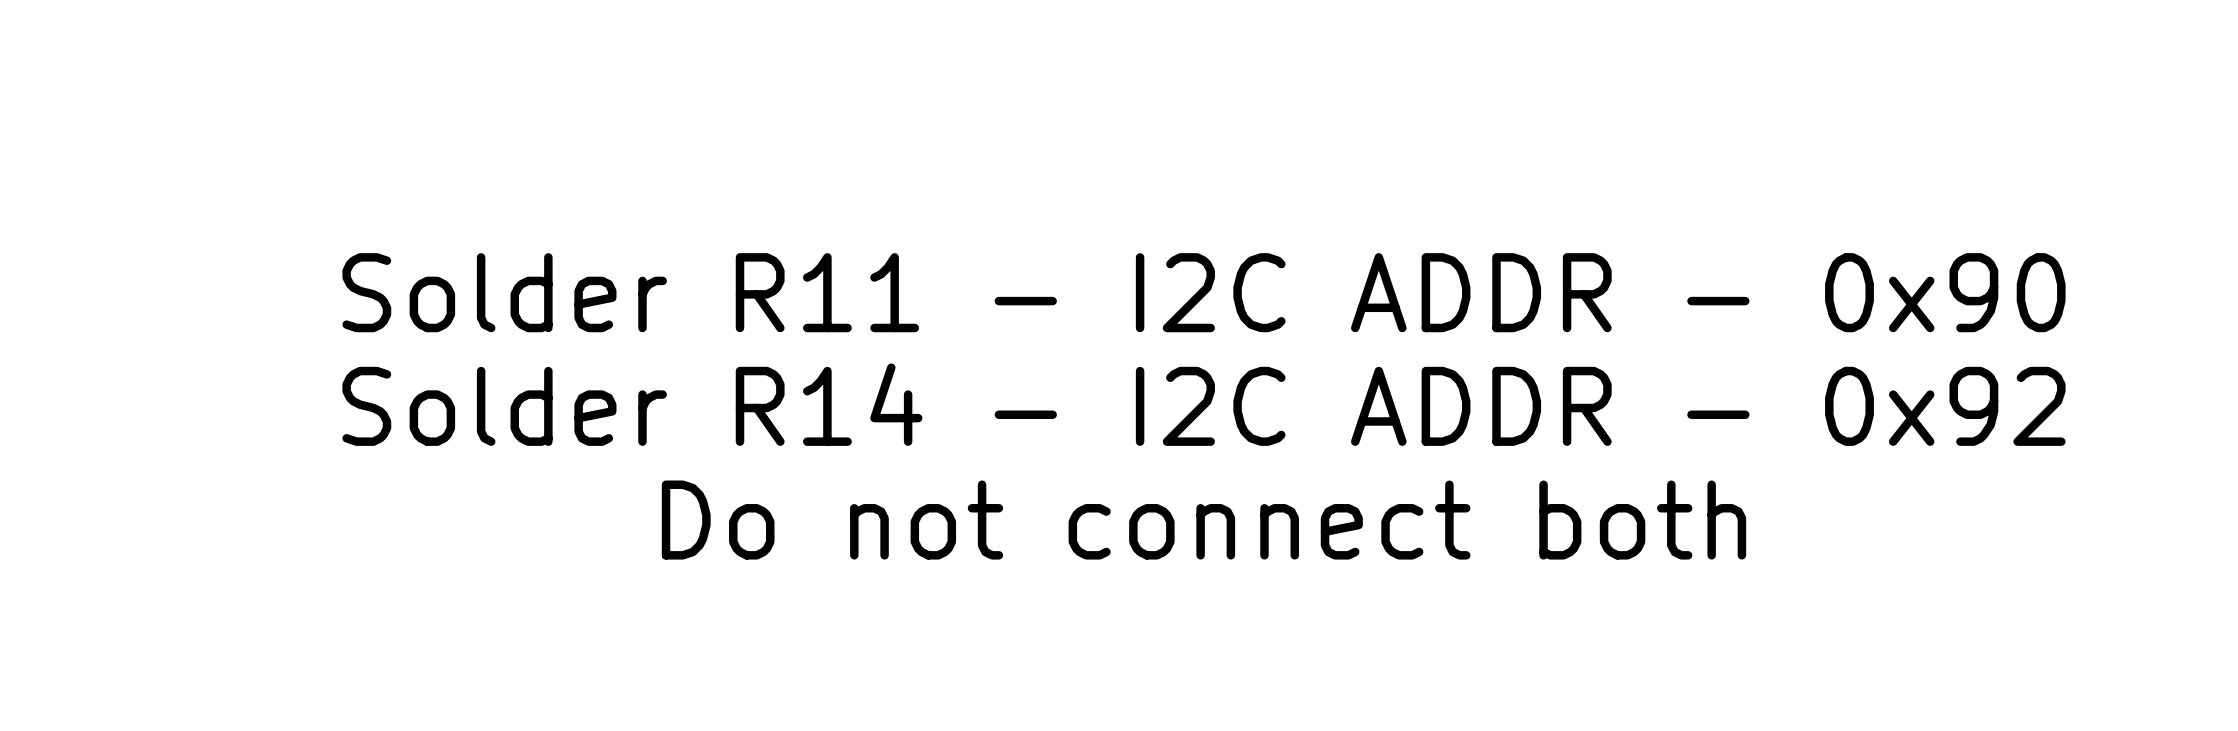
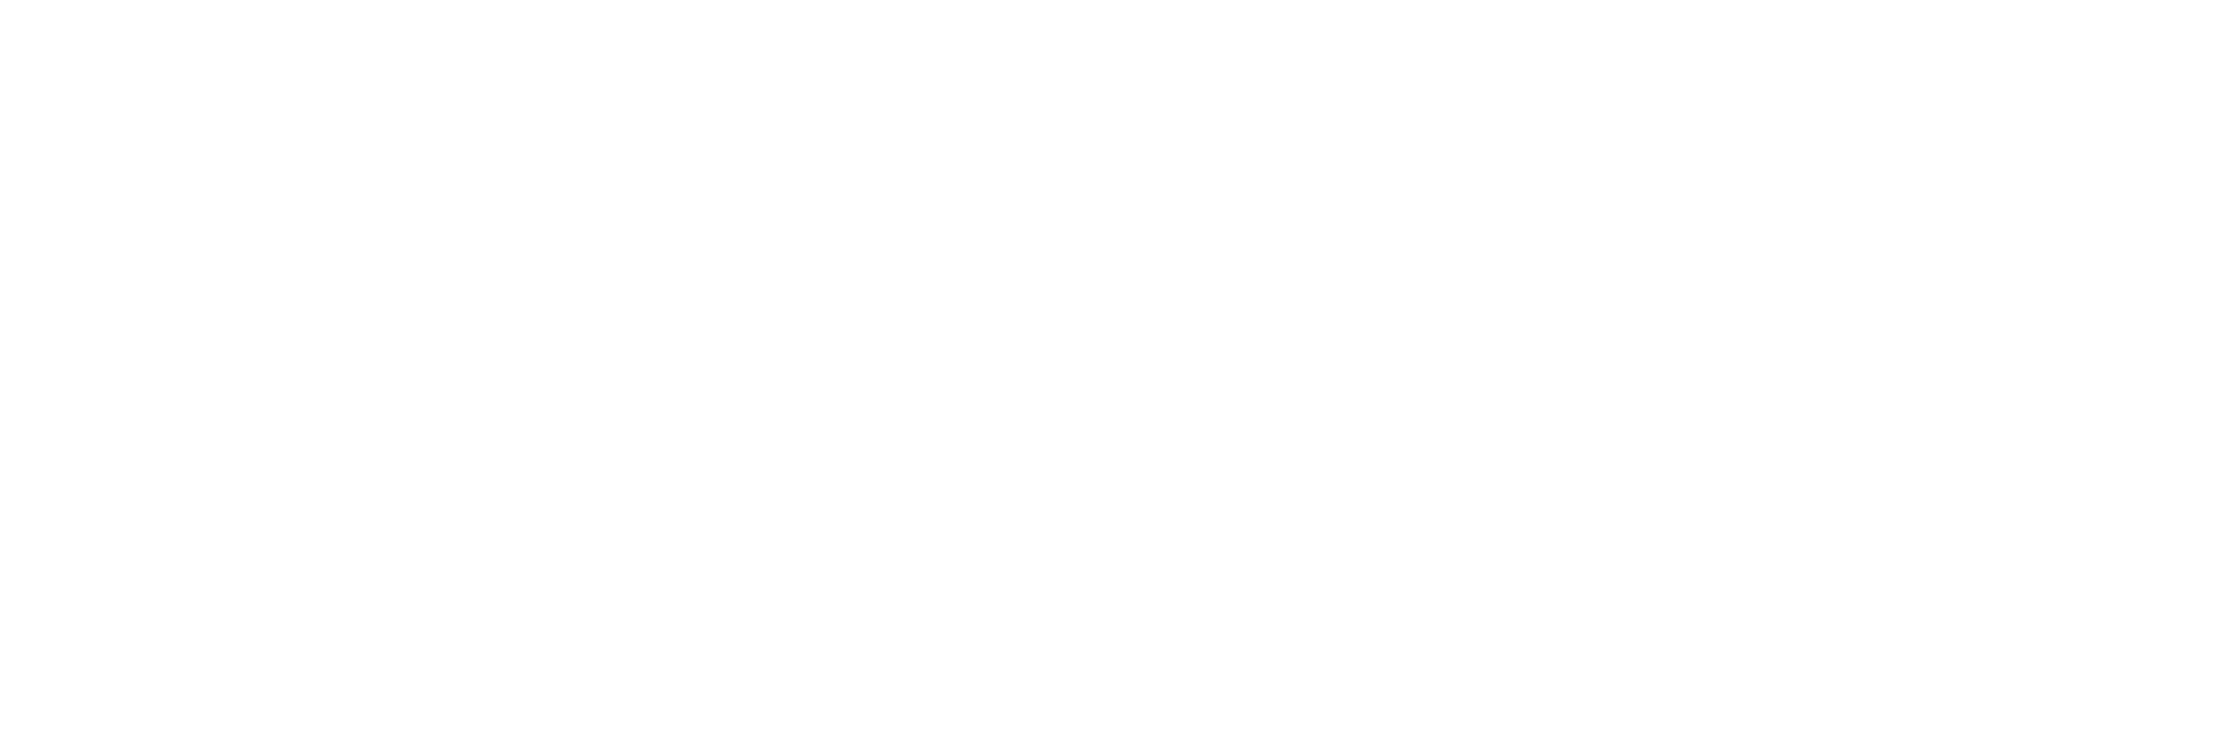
text: Solder R11 - I2C ADDR - 0x90 (1203, 292) -> none
text: Solder R14 - I2C ADDR - 0x92 (1203, 404) -> none
text: Do not connect both (1203, 520) -> none

